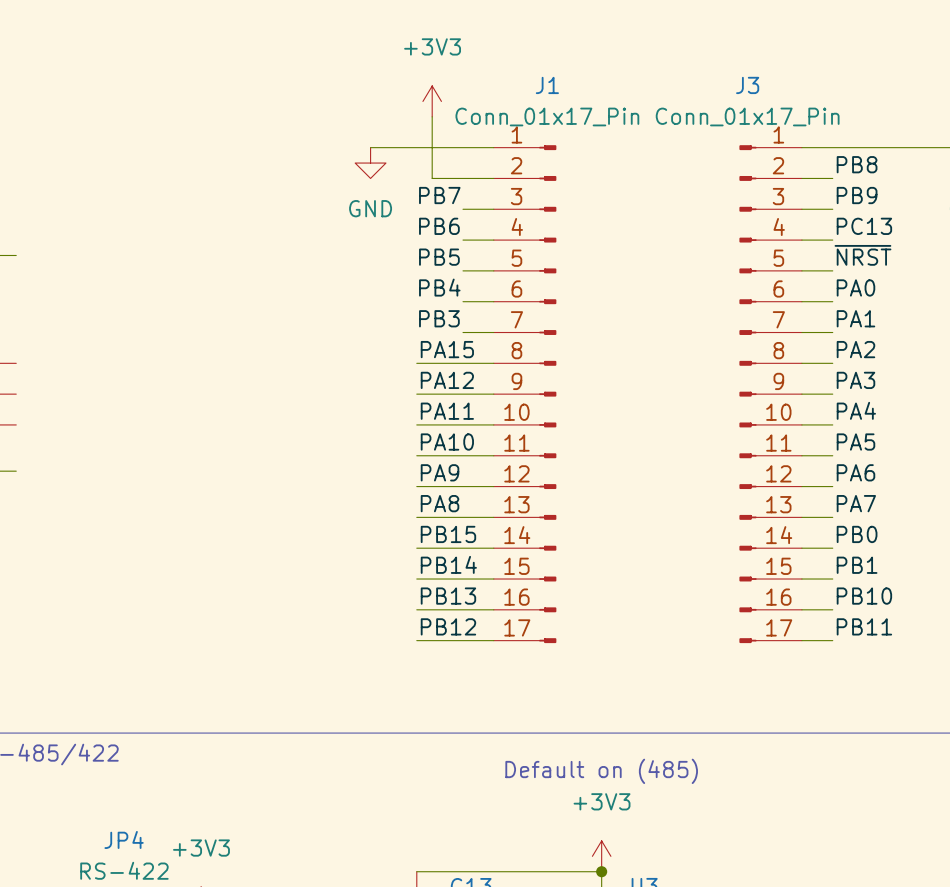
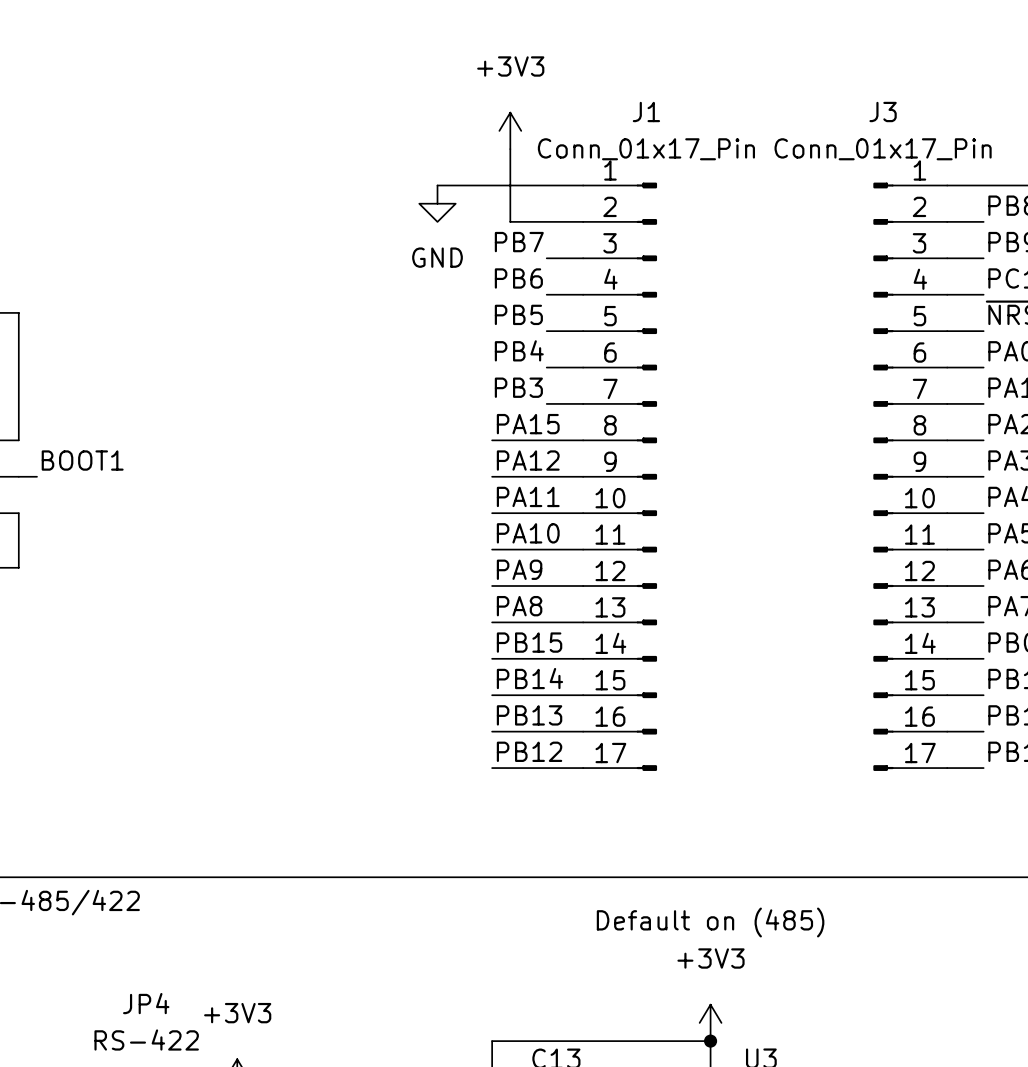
wire: none -> (18, 312) (18, 440)
label: none -> BOOT1 (82, 460)
wire: none -> (18, 476) (37, 476)
wire: none -> (18, 513) (18, 567)

